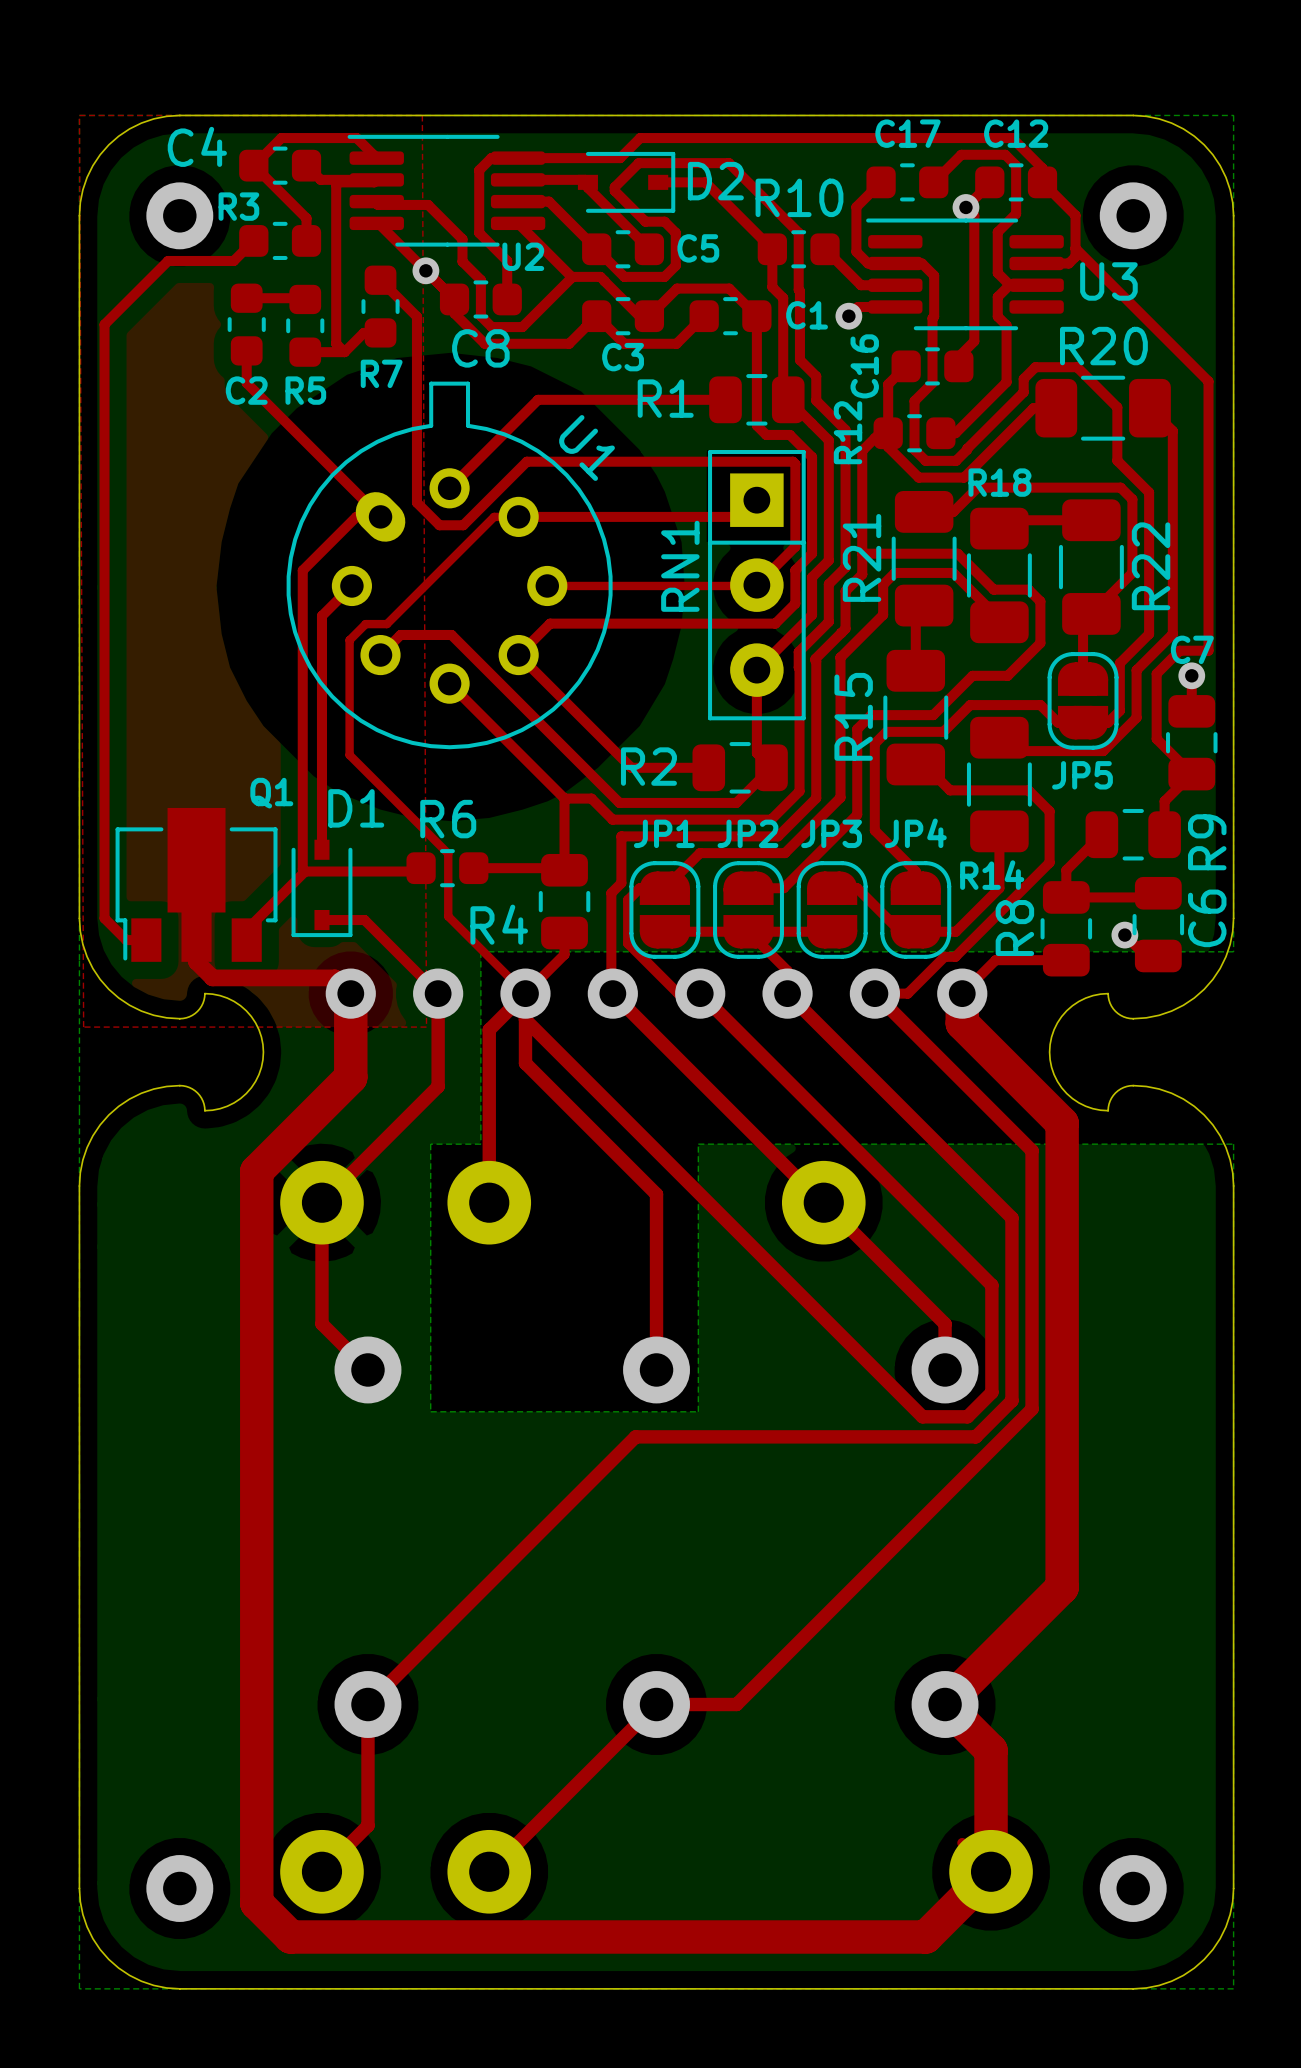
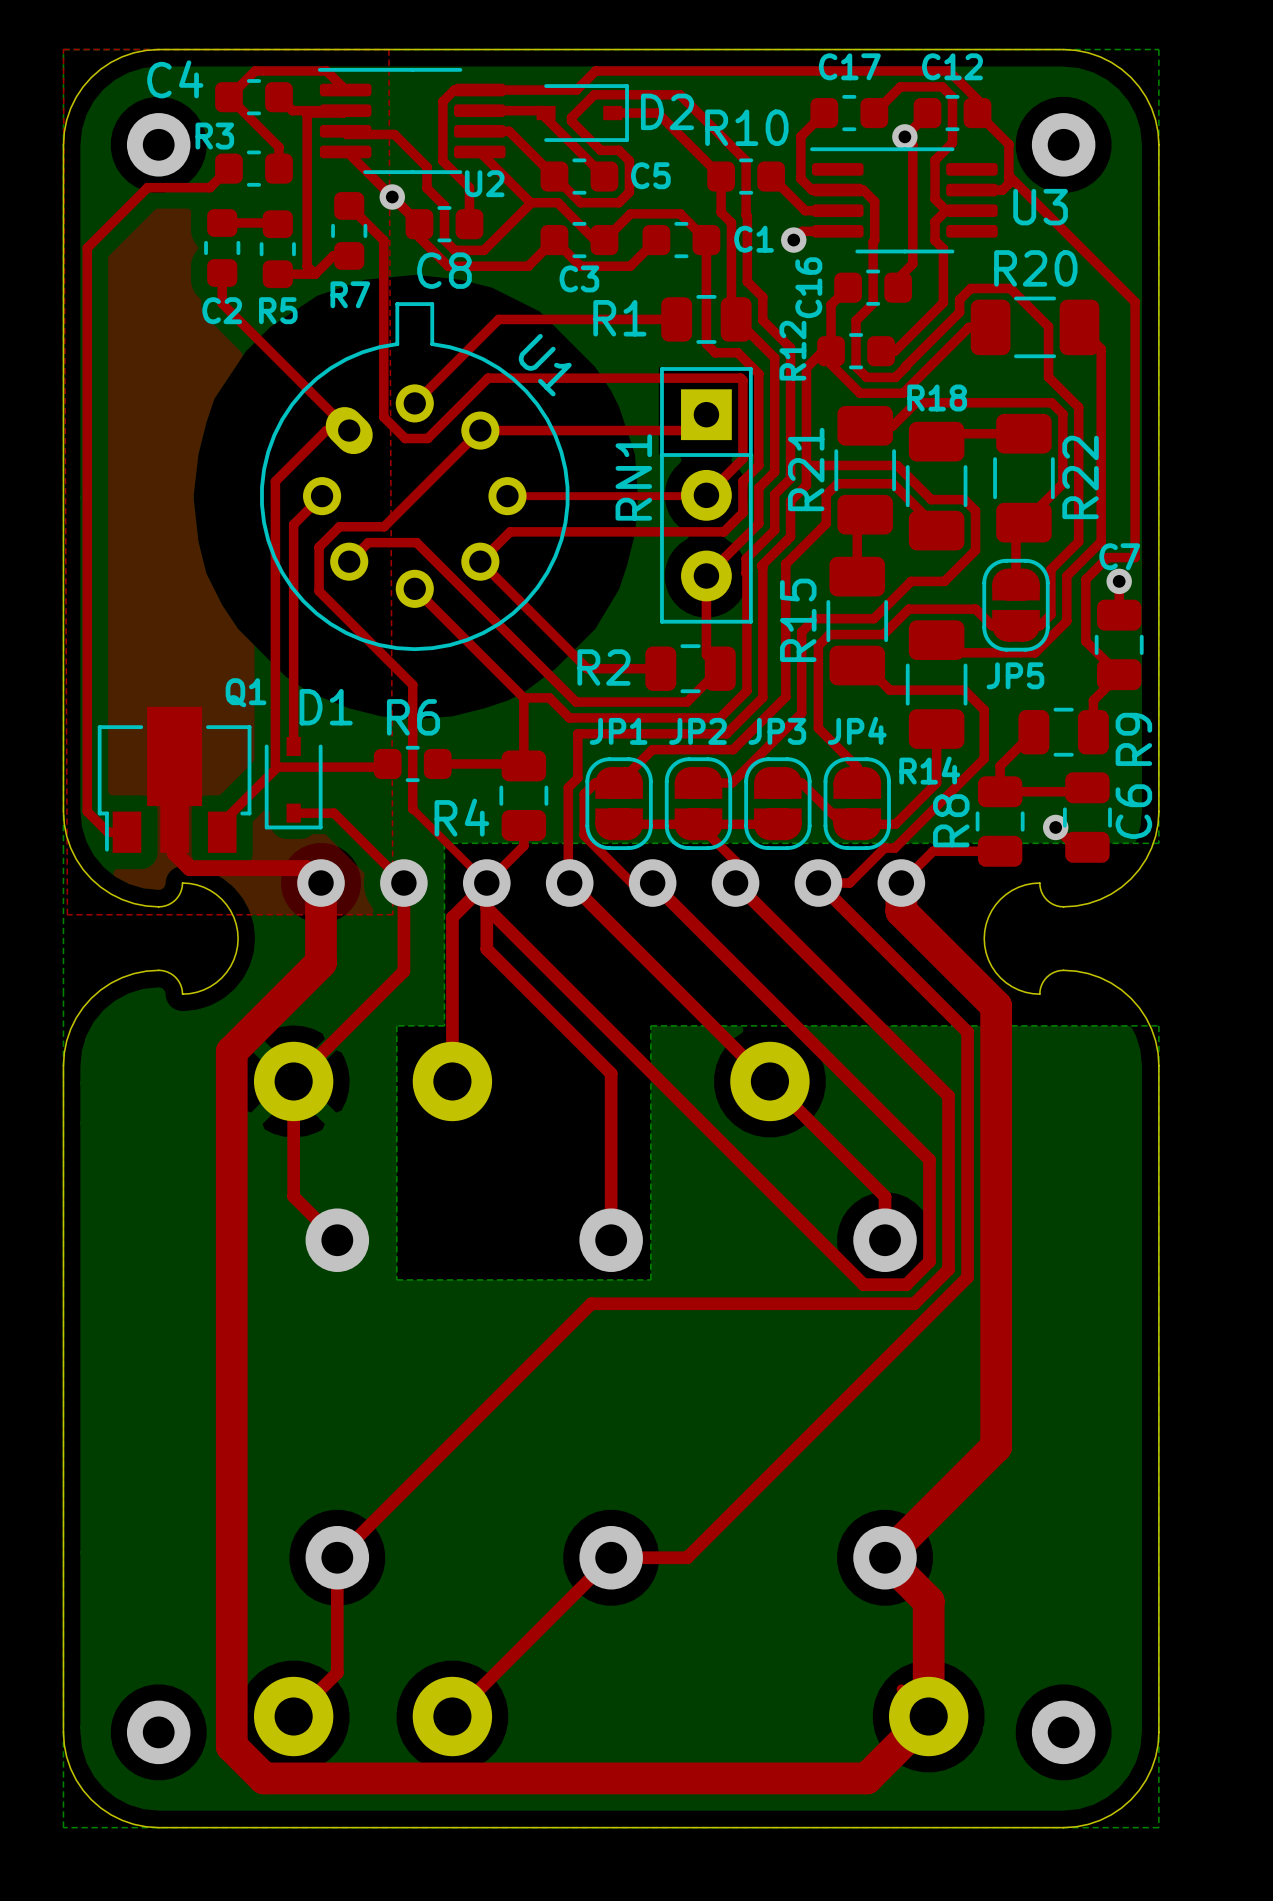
top track: (518, 516) (494, 516) (386, 624) (365, 624) (349, 640) (349, 755) (448, 853) (448, 916) -> (480, 430) (384, 526) (339, 526) (319, 547) (319, 591) (412, 684) (413, 809)

